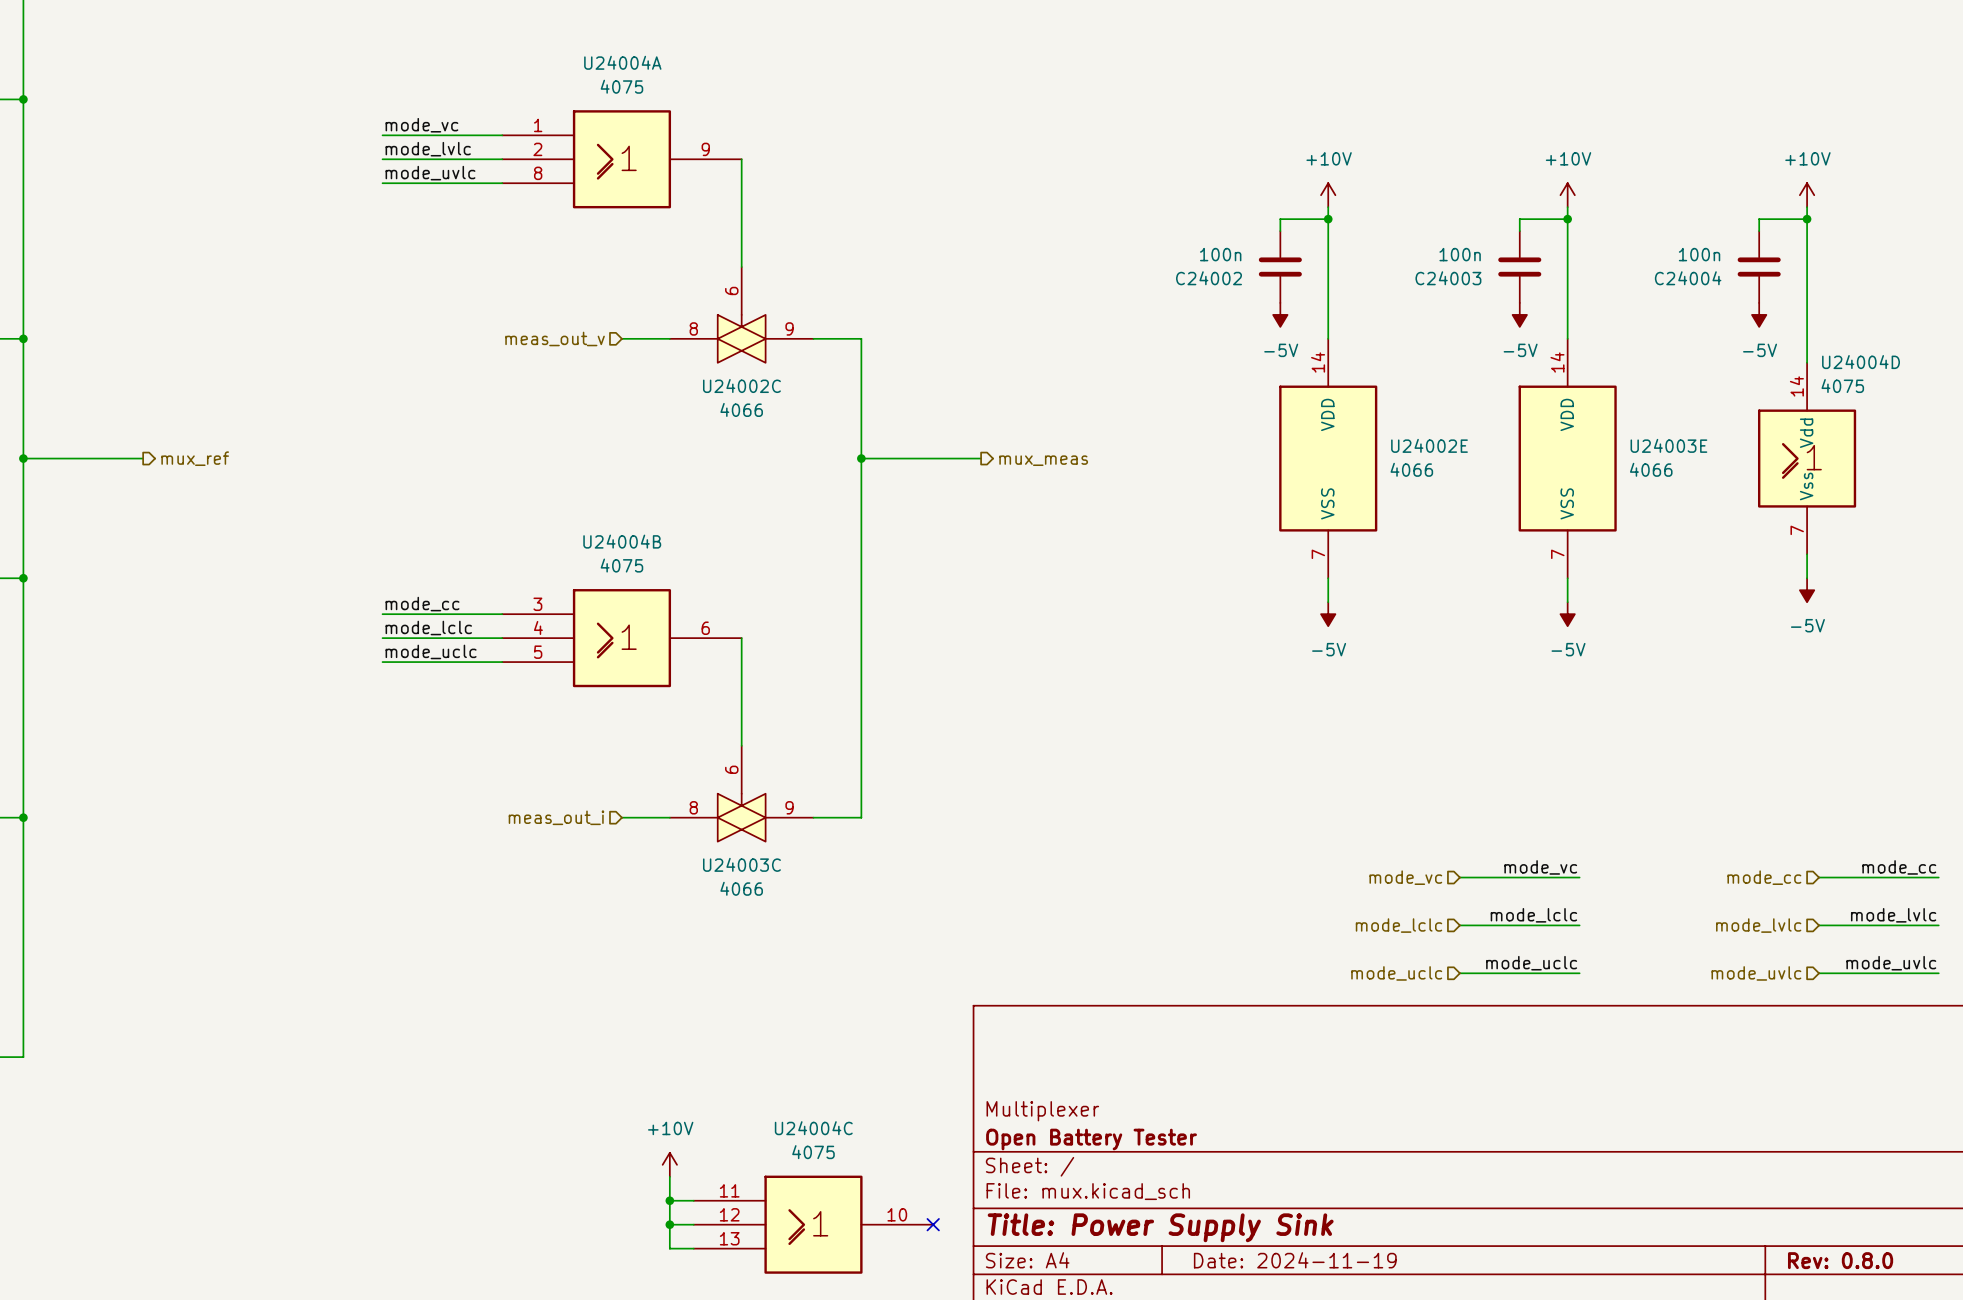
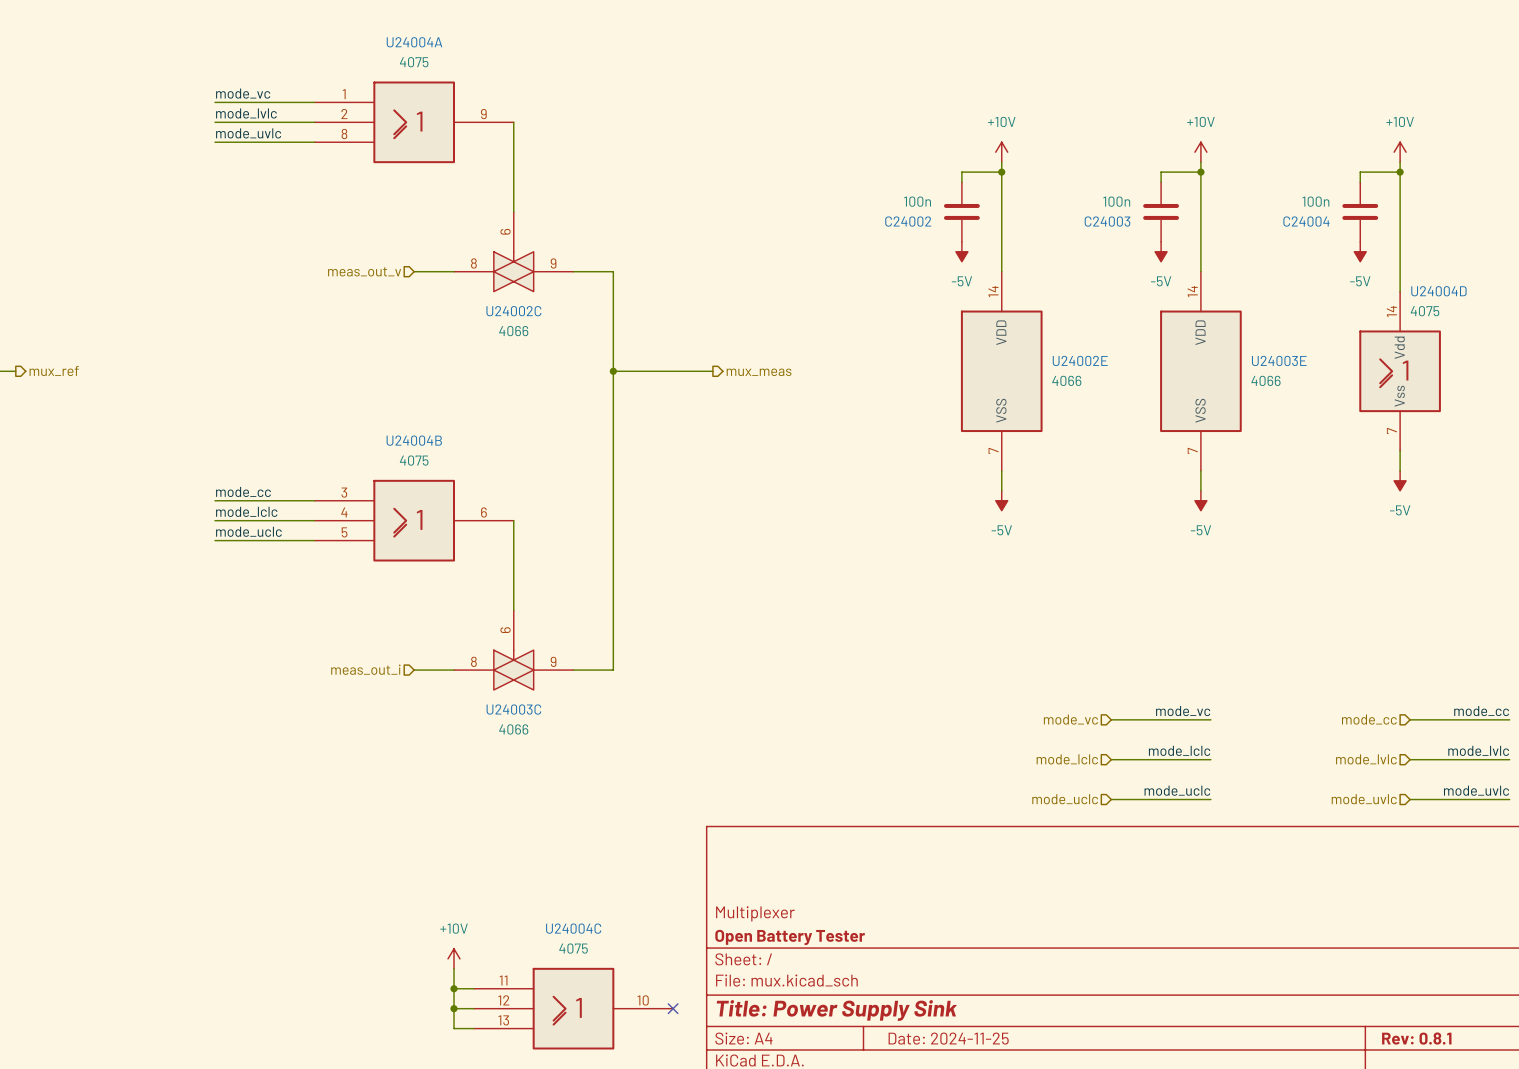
title block: Date: 2024-11-19 (1295, 1260) -> Date: 2024-11-25 (948, 1038)
title block: Rev: 0.8.0 (1840, 1260) -> Rev: 0.8.1 (1416, 1038)

